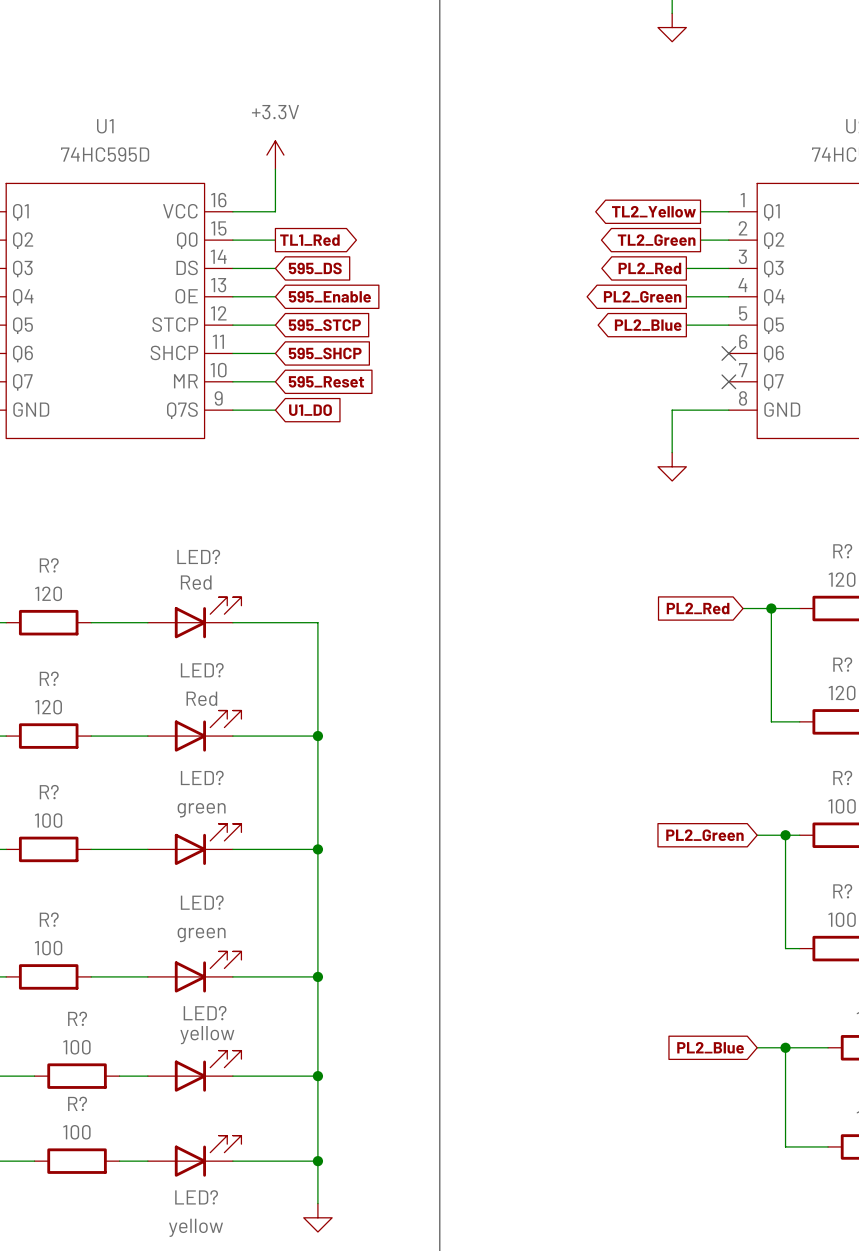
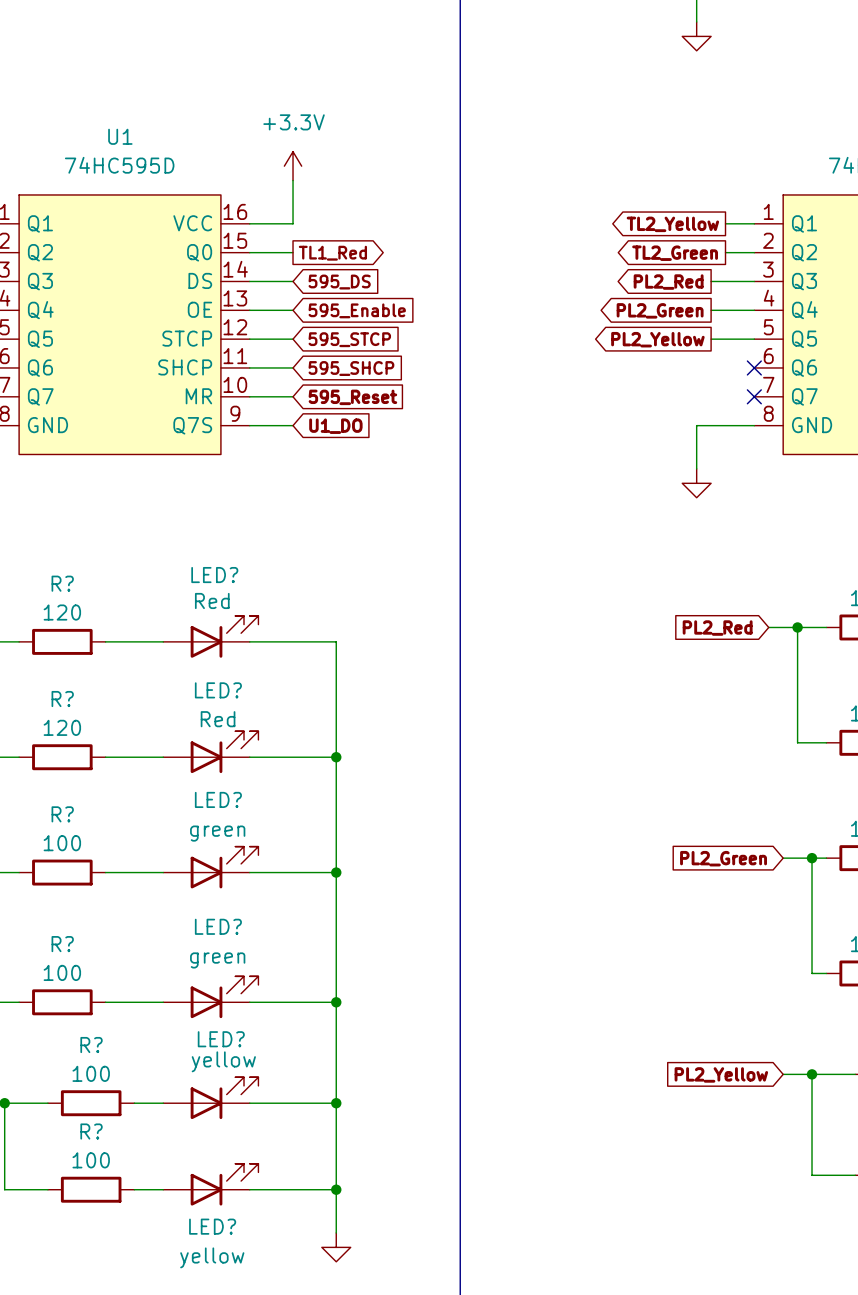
global label: PL2_Blue (648, 325) -> PL2_Yellow (657, 339)
global label: PL2_Blue (710, 1047) -> PL2_Yellow (721, 1074)

